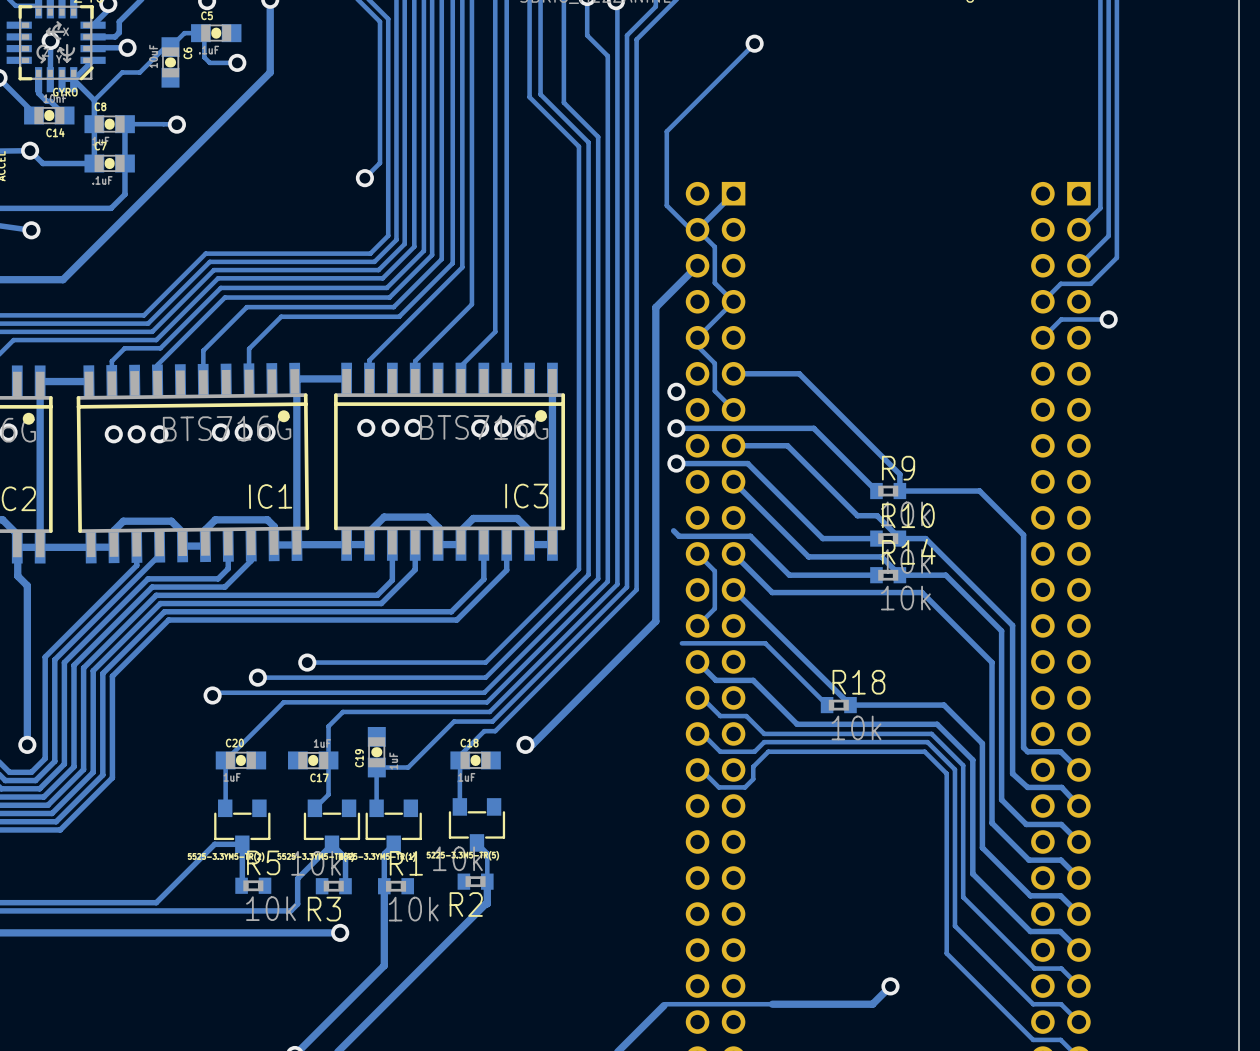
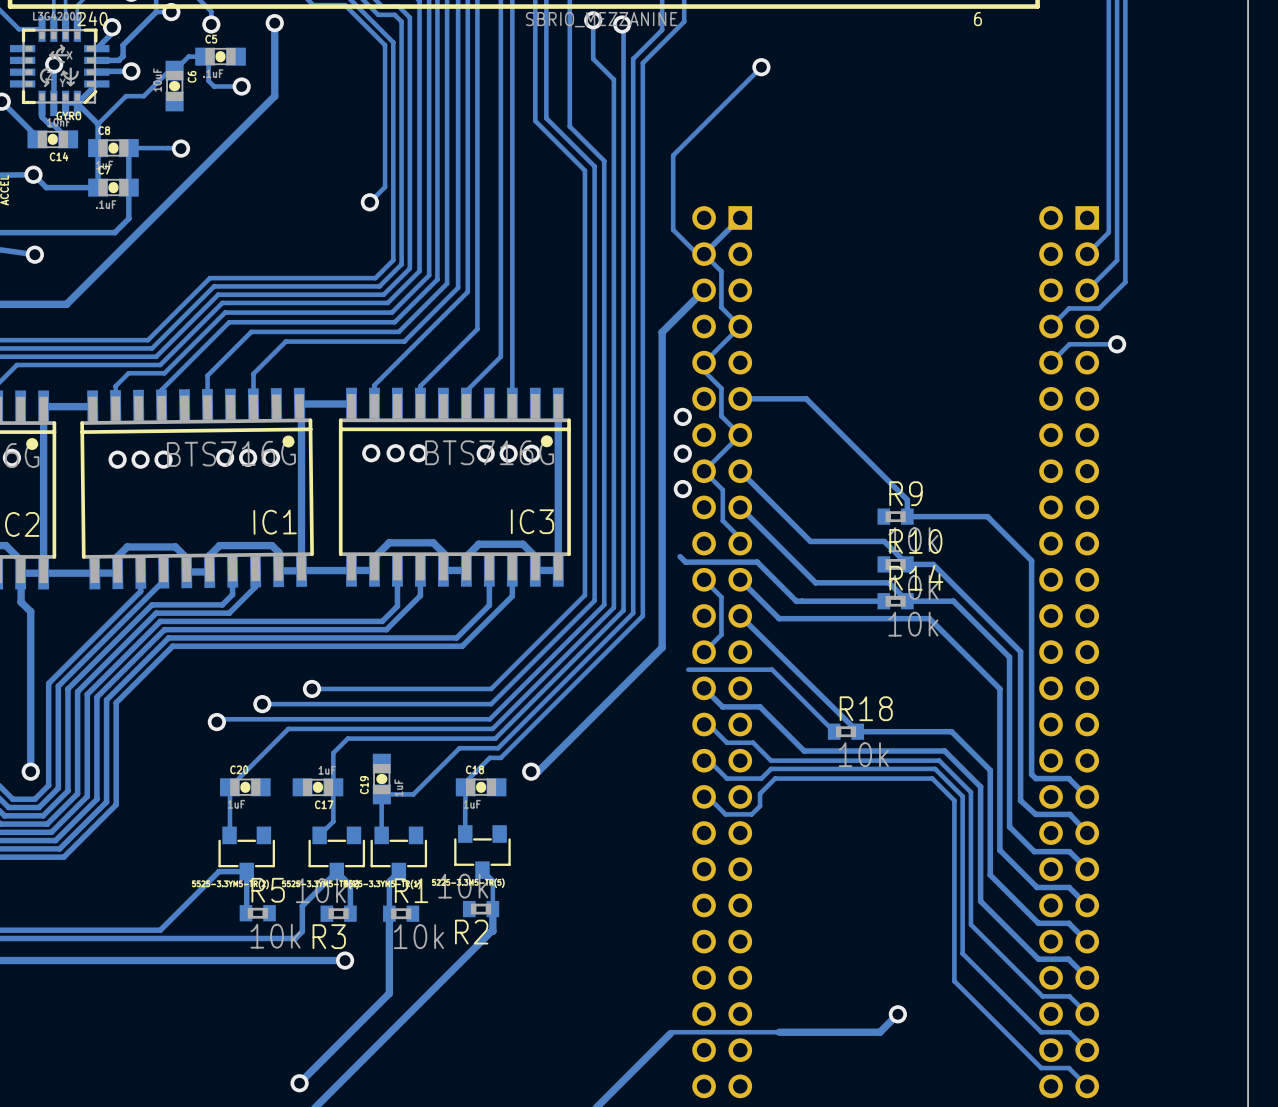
track: none -> (740, 435) (704, 471) (722, 489) (722, 520) (740, 538)
track: (676, 428) (813, 428) (876, 491) -> none
track: (733, 445) (787, 445) (857, 515) -> (740, 471) (810, 541) (864, 541)
track: (676, 463) (747, 463) (822, 538) (876, 538) -> none

